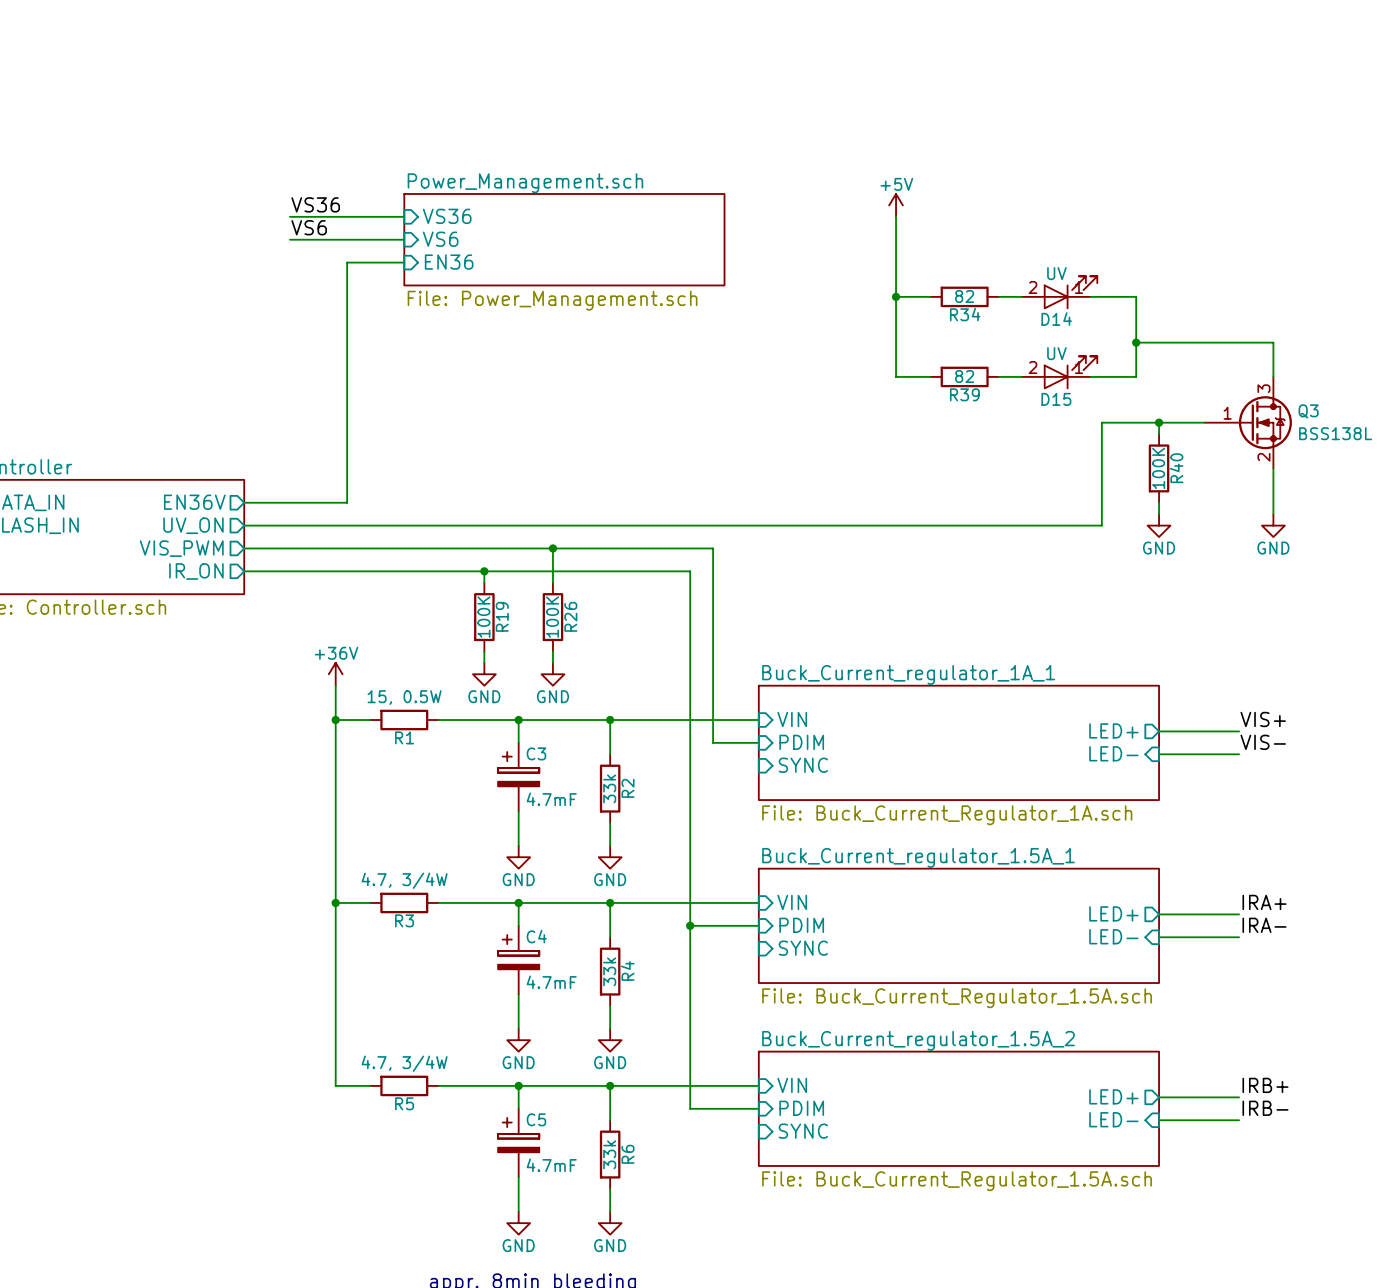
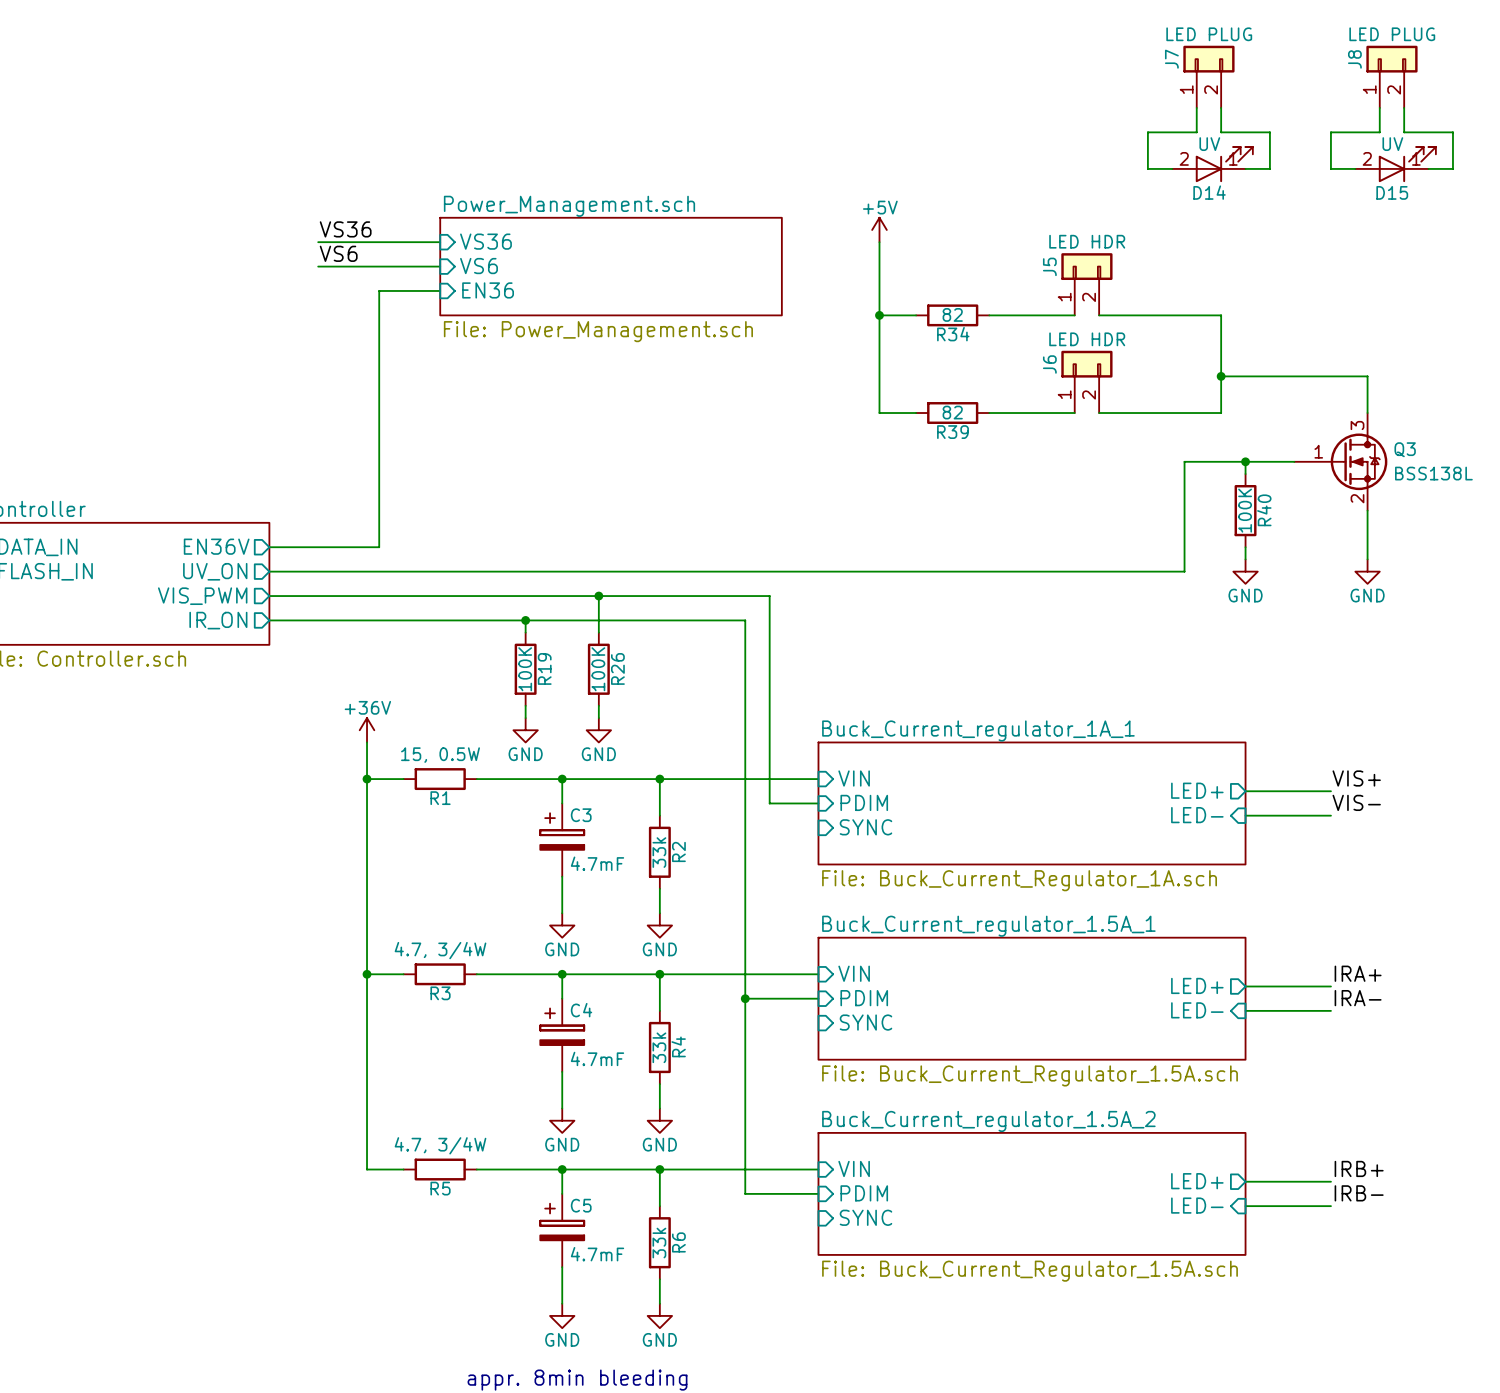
J7: none -> LED PLUG (1208, 76)
J8: none -> LED PLUG (1391, 76)
wire: none -> (1196, 107) (1196, 132) (1147, 132) (1147, 168) (1172, 168)
wire: none -> (1221, 107) (1221, 132) (1269, 132) (1269, 168) (1245, 168)
wire: none -> (1379, 107) (1379, 132) (1330, 132) (1330, 168) (1355, 168)
wire: none -> (1404, 107) (1404, 132) (1452, 132) (1452, 168) (1428, 168)
power symbol position: +5V (896, 205) -> +5V (879, 229)
wire: none -> (879, 242) (879, 413) (916, 413)
wire: (896, 216) (896, 376) (918, 376) -> none
J5: none -> LED HDR (1086, 284)
junction: none -> (879, 315)
wire: none -> (989, 315) (1074, 315)
D14 position: (1059, 292) -> (1212, 164)
wire: (896, 296) (930, 296) -> (879, 315) (916, 315)
junction: (896, 296) -> none
R34 position: (964, 296) -> (952, 315)
wire: (998, 296) (1021, 296) -> none
wire: (1090, 296) (1136, 296) -> (1099, 315) (1221, 315) (1221, 327)
J6: none -> LED HDR (1086, 381)
D15 position: (1059, 372) -> (1395, 164)
R39 position: (964, 376) -> (952, 413)
wire: (998, 376) (1021, 376) -> (1074, 413) (1001, 413)

